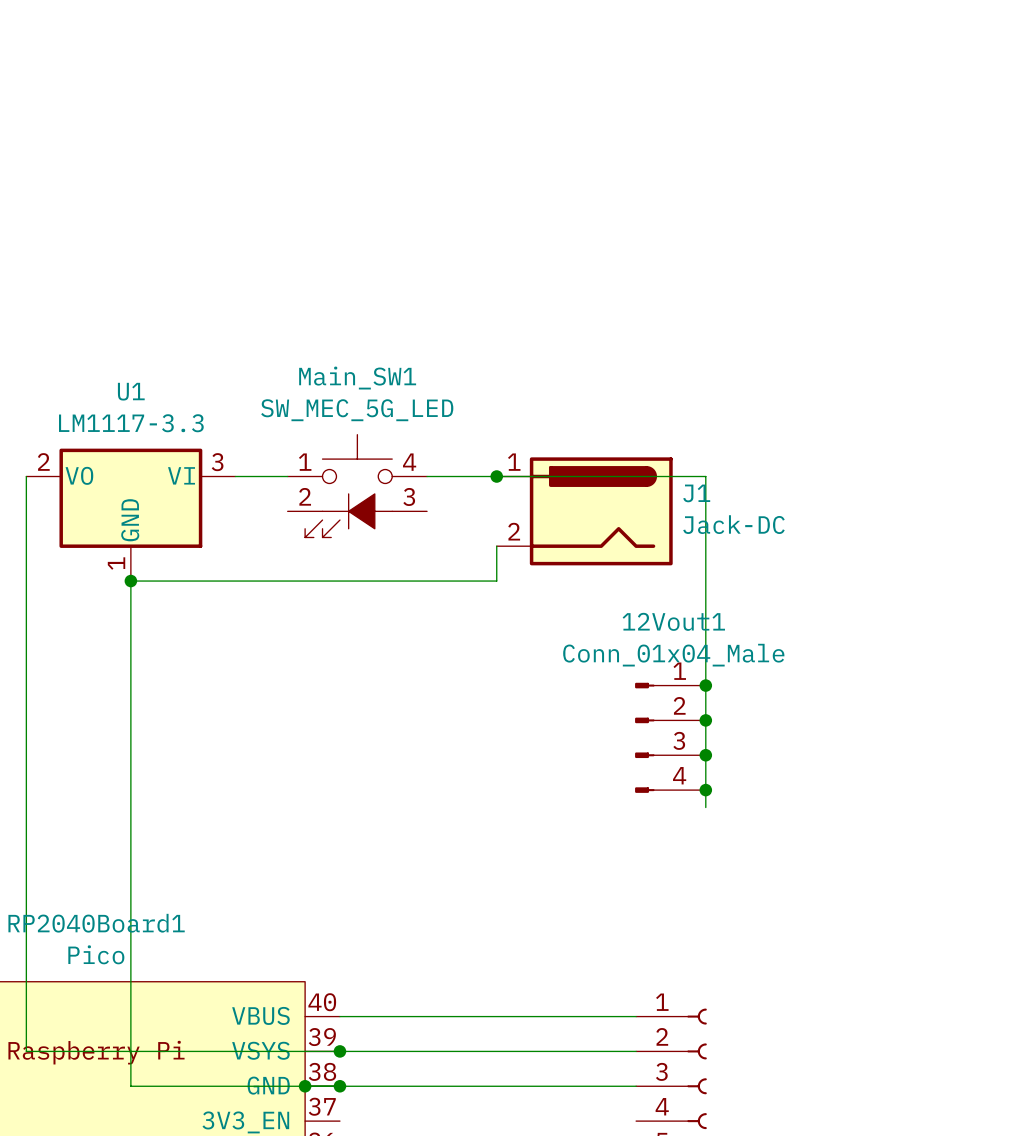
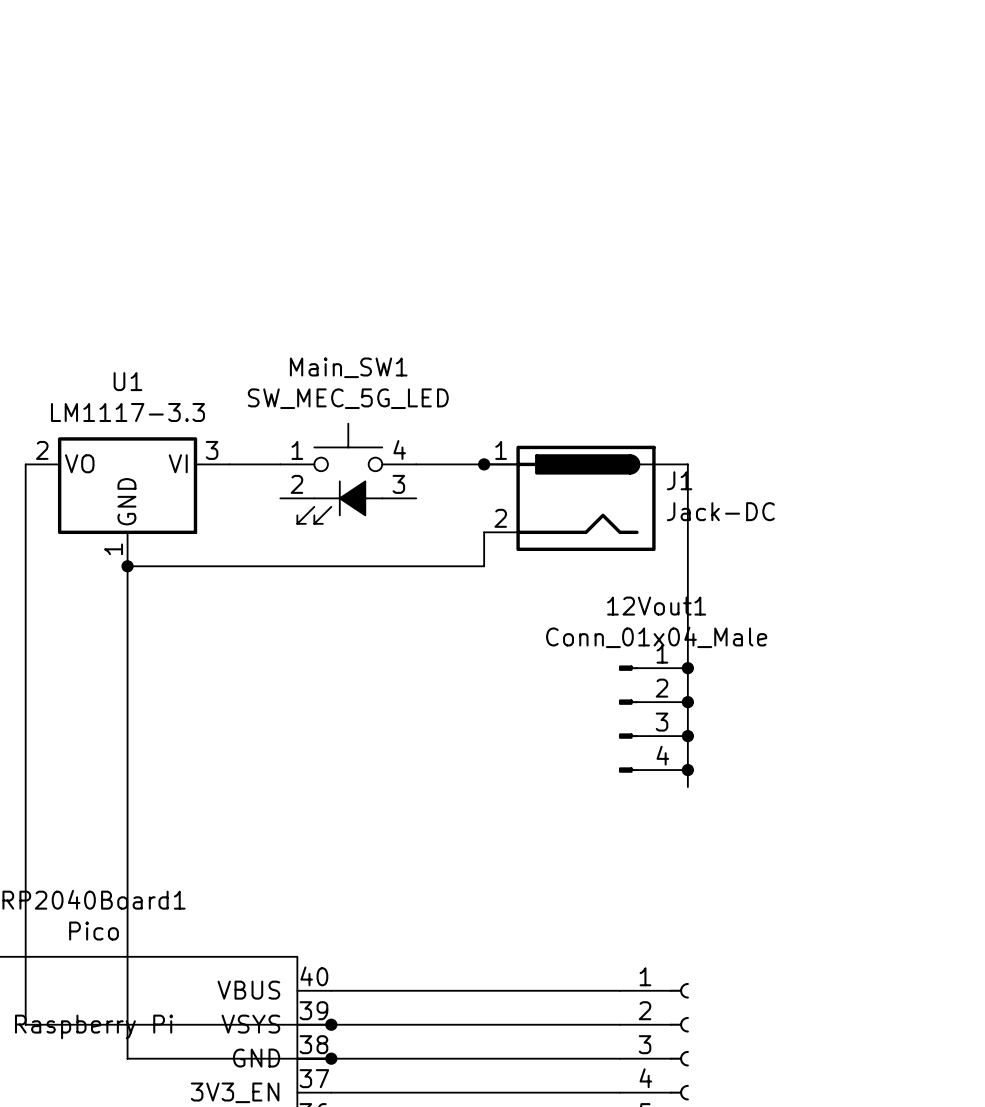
junction: (305, 1086) -> none
wire: none -> (331, 1092) (619, 1092)

